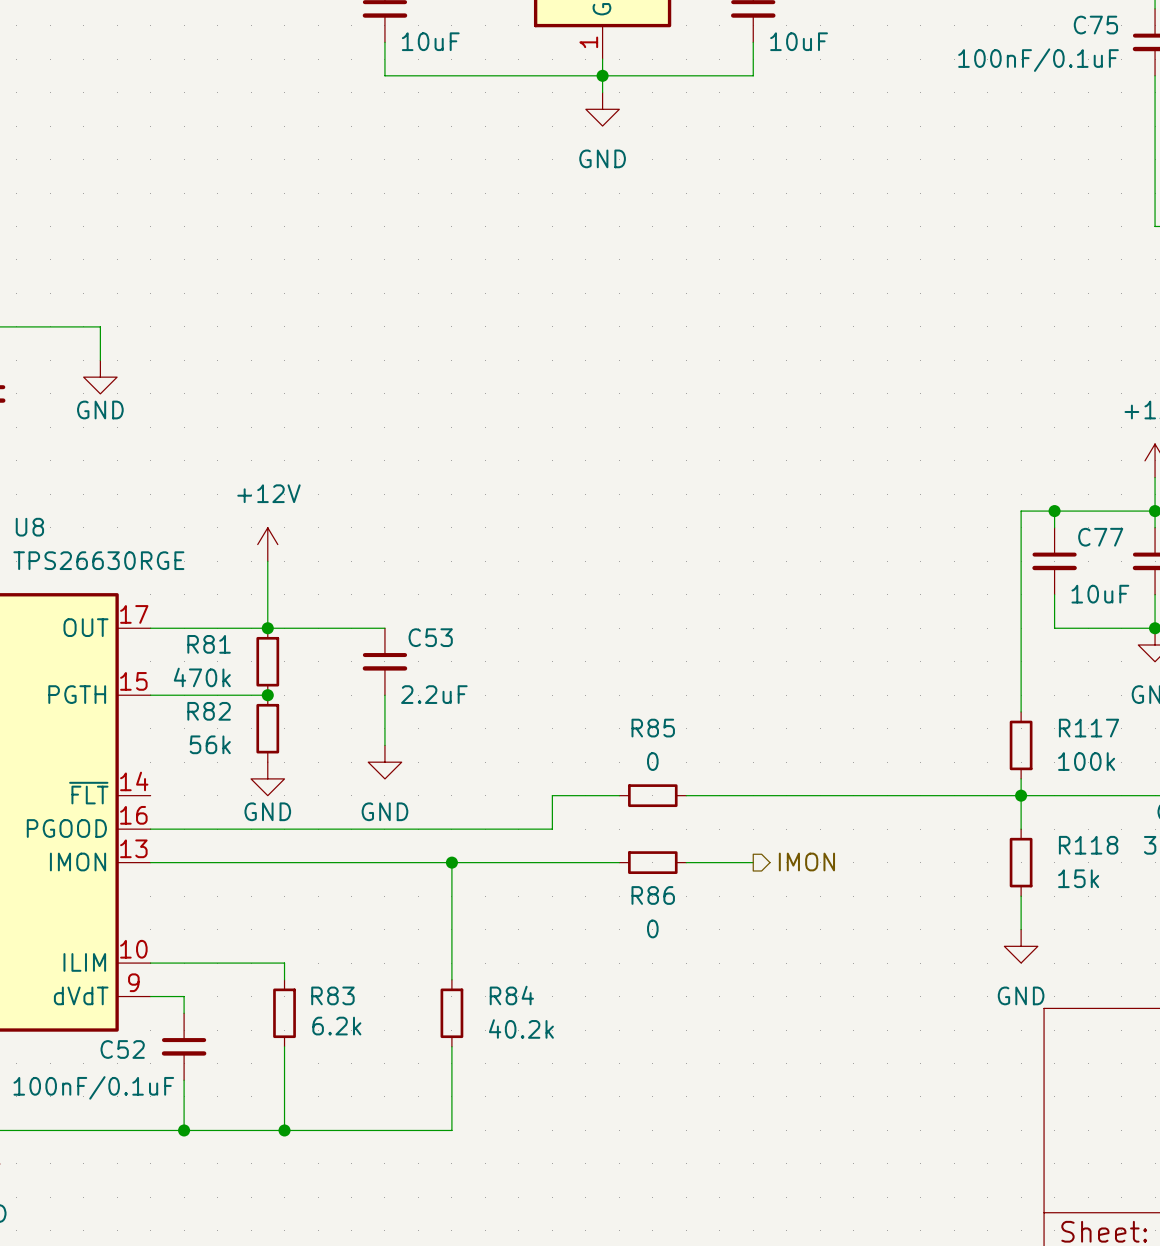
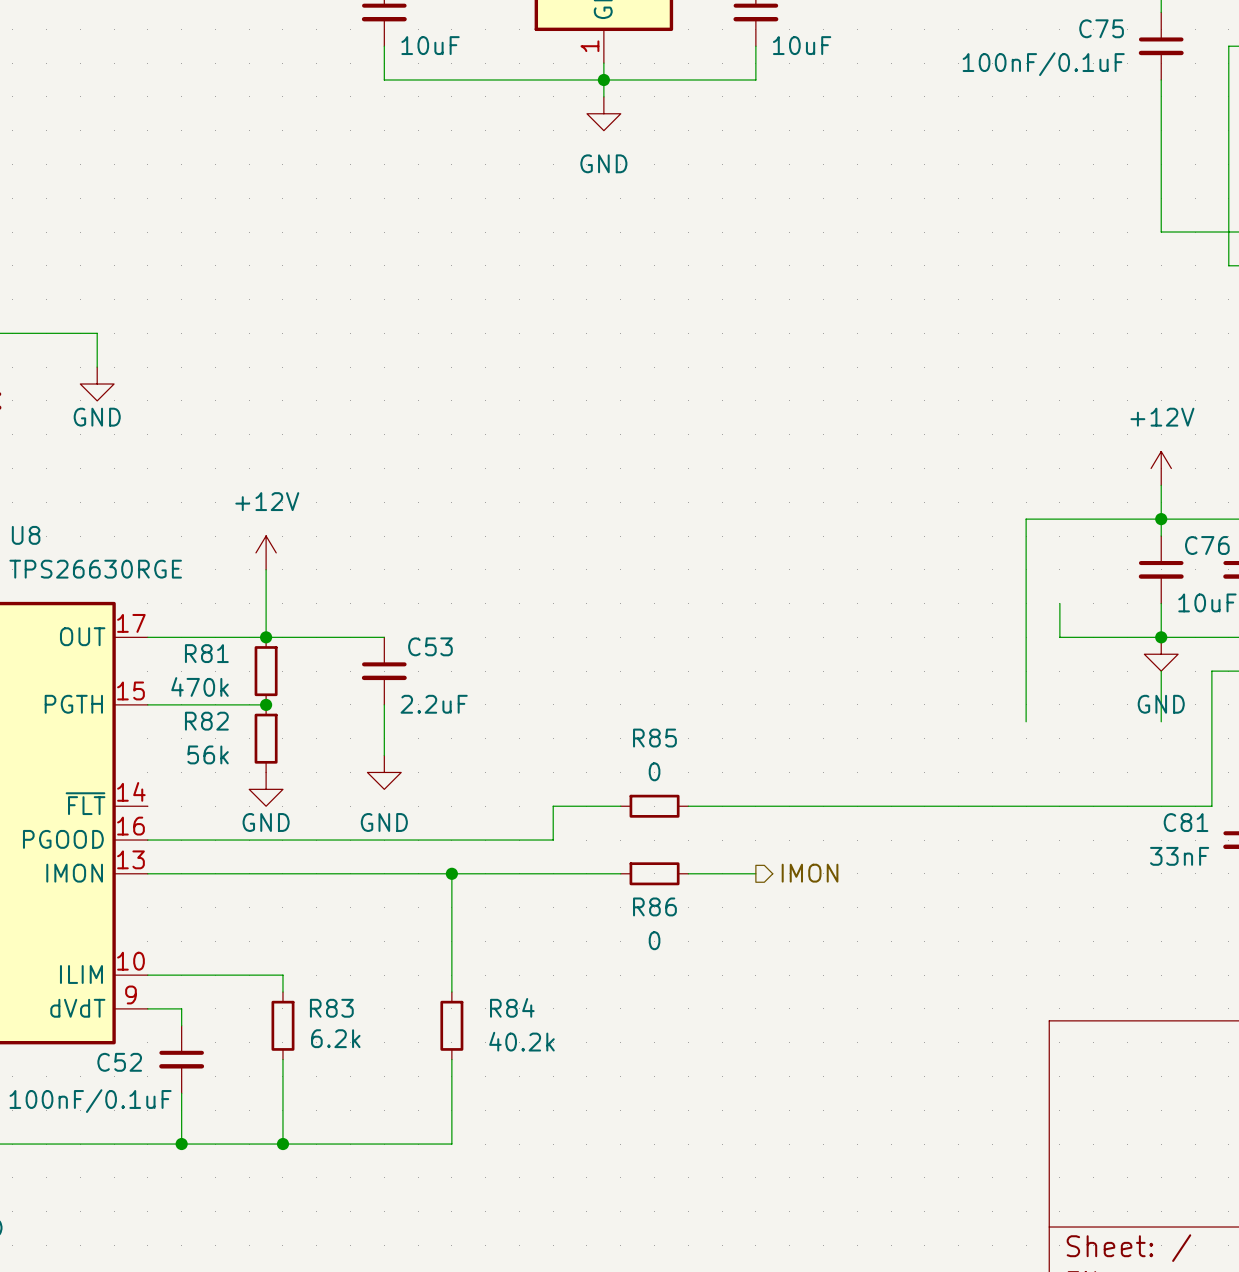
wire: (1054, 511) (1054, 527) -> none
junction: (1054, 511) -> none
C77: 10uF (1054, 561) -> none
R117: 100k (1021, 745) -> none
wire: (1021, 778) (1021, 829) -> (1161, 671) (1161, 721)
junction: (1021, 795) -> none
R118: 15k (1021, 862) -> none
wire: (1021, 896) (1021, 929) -> none
power symbol: GND (1021, 946) -> none

